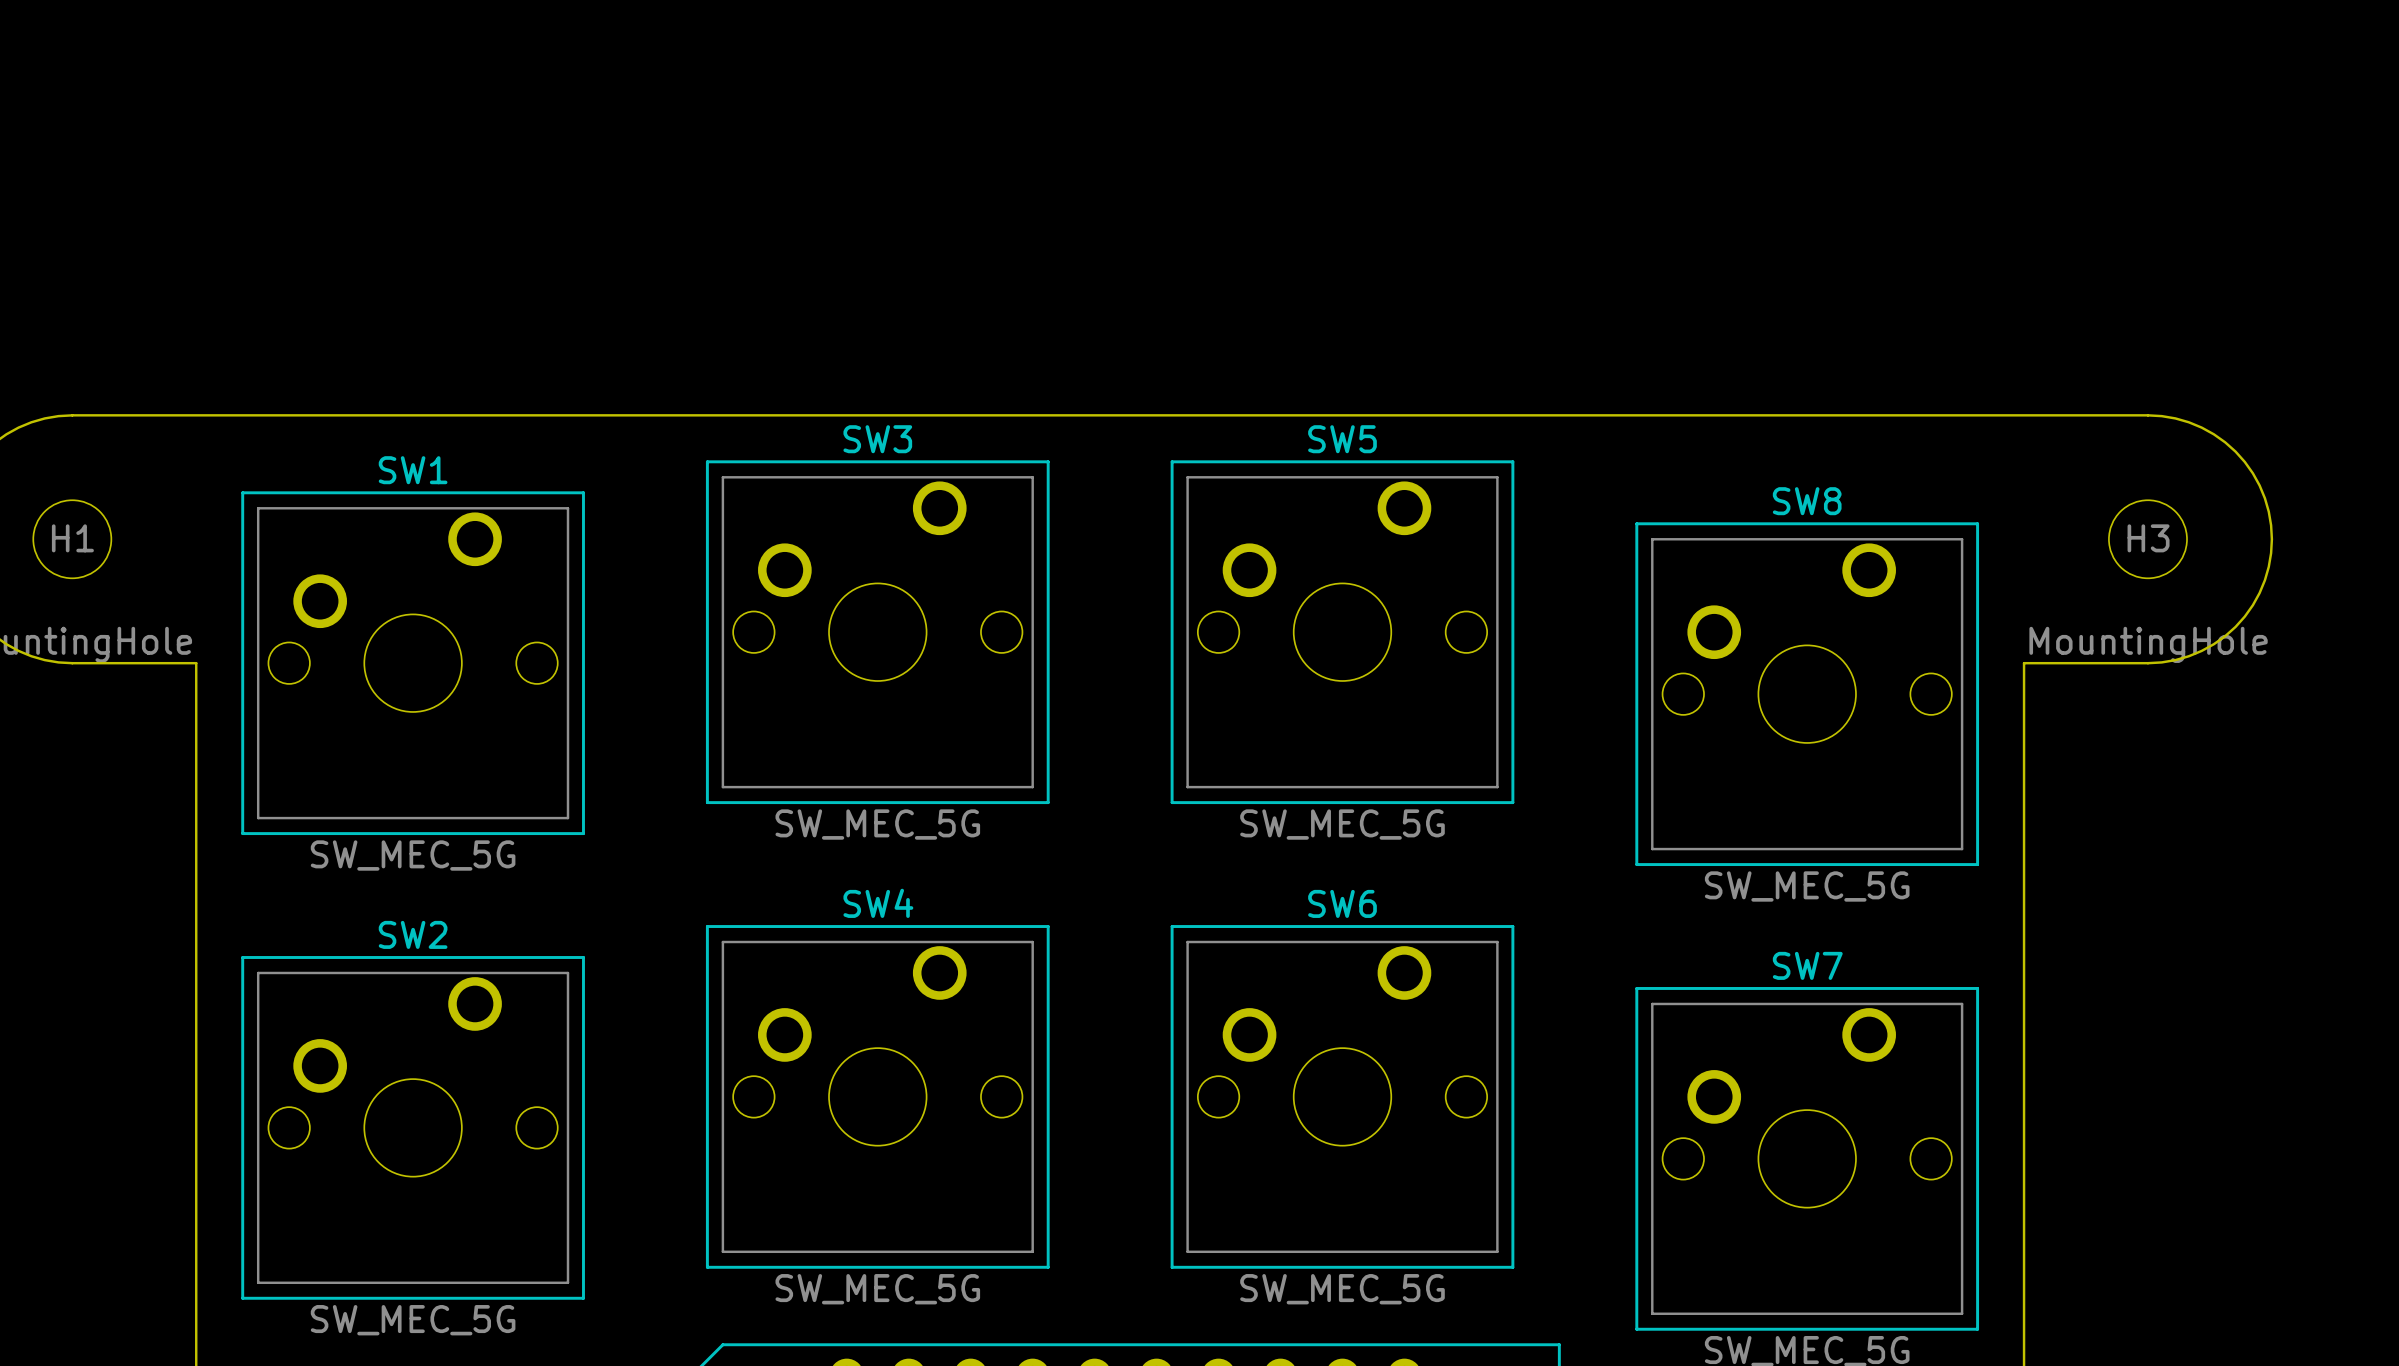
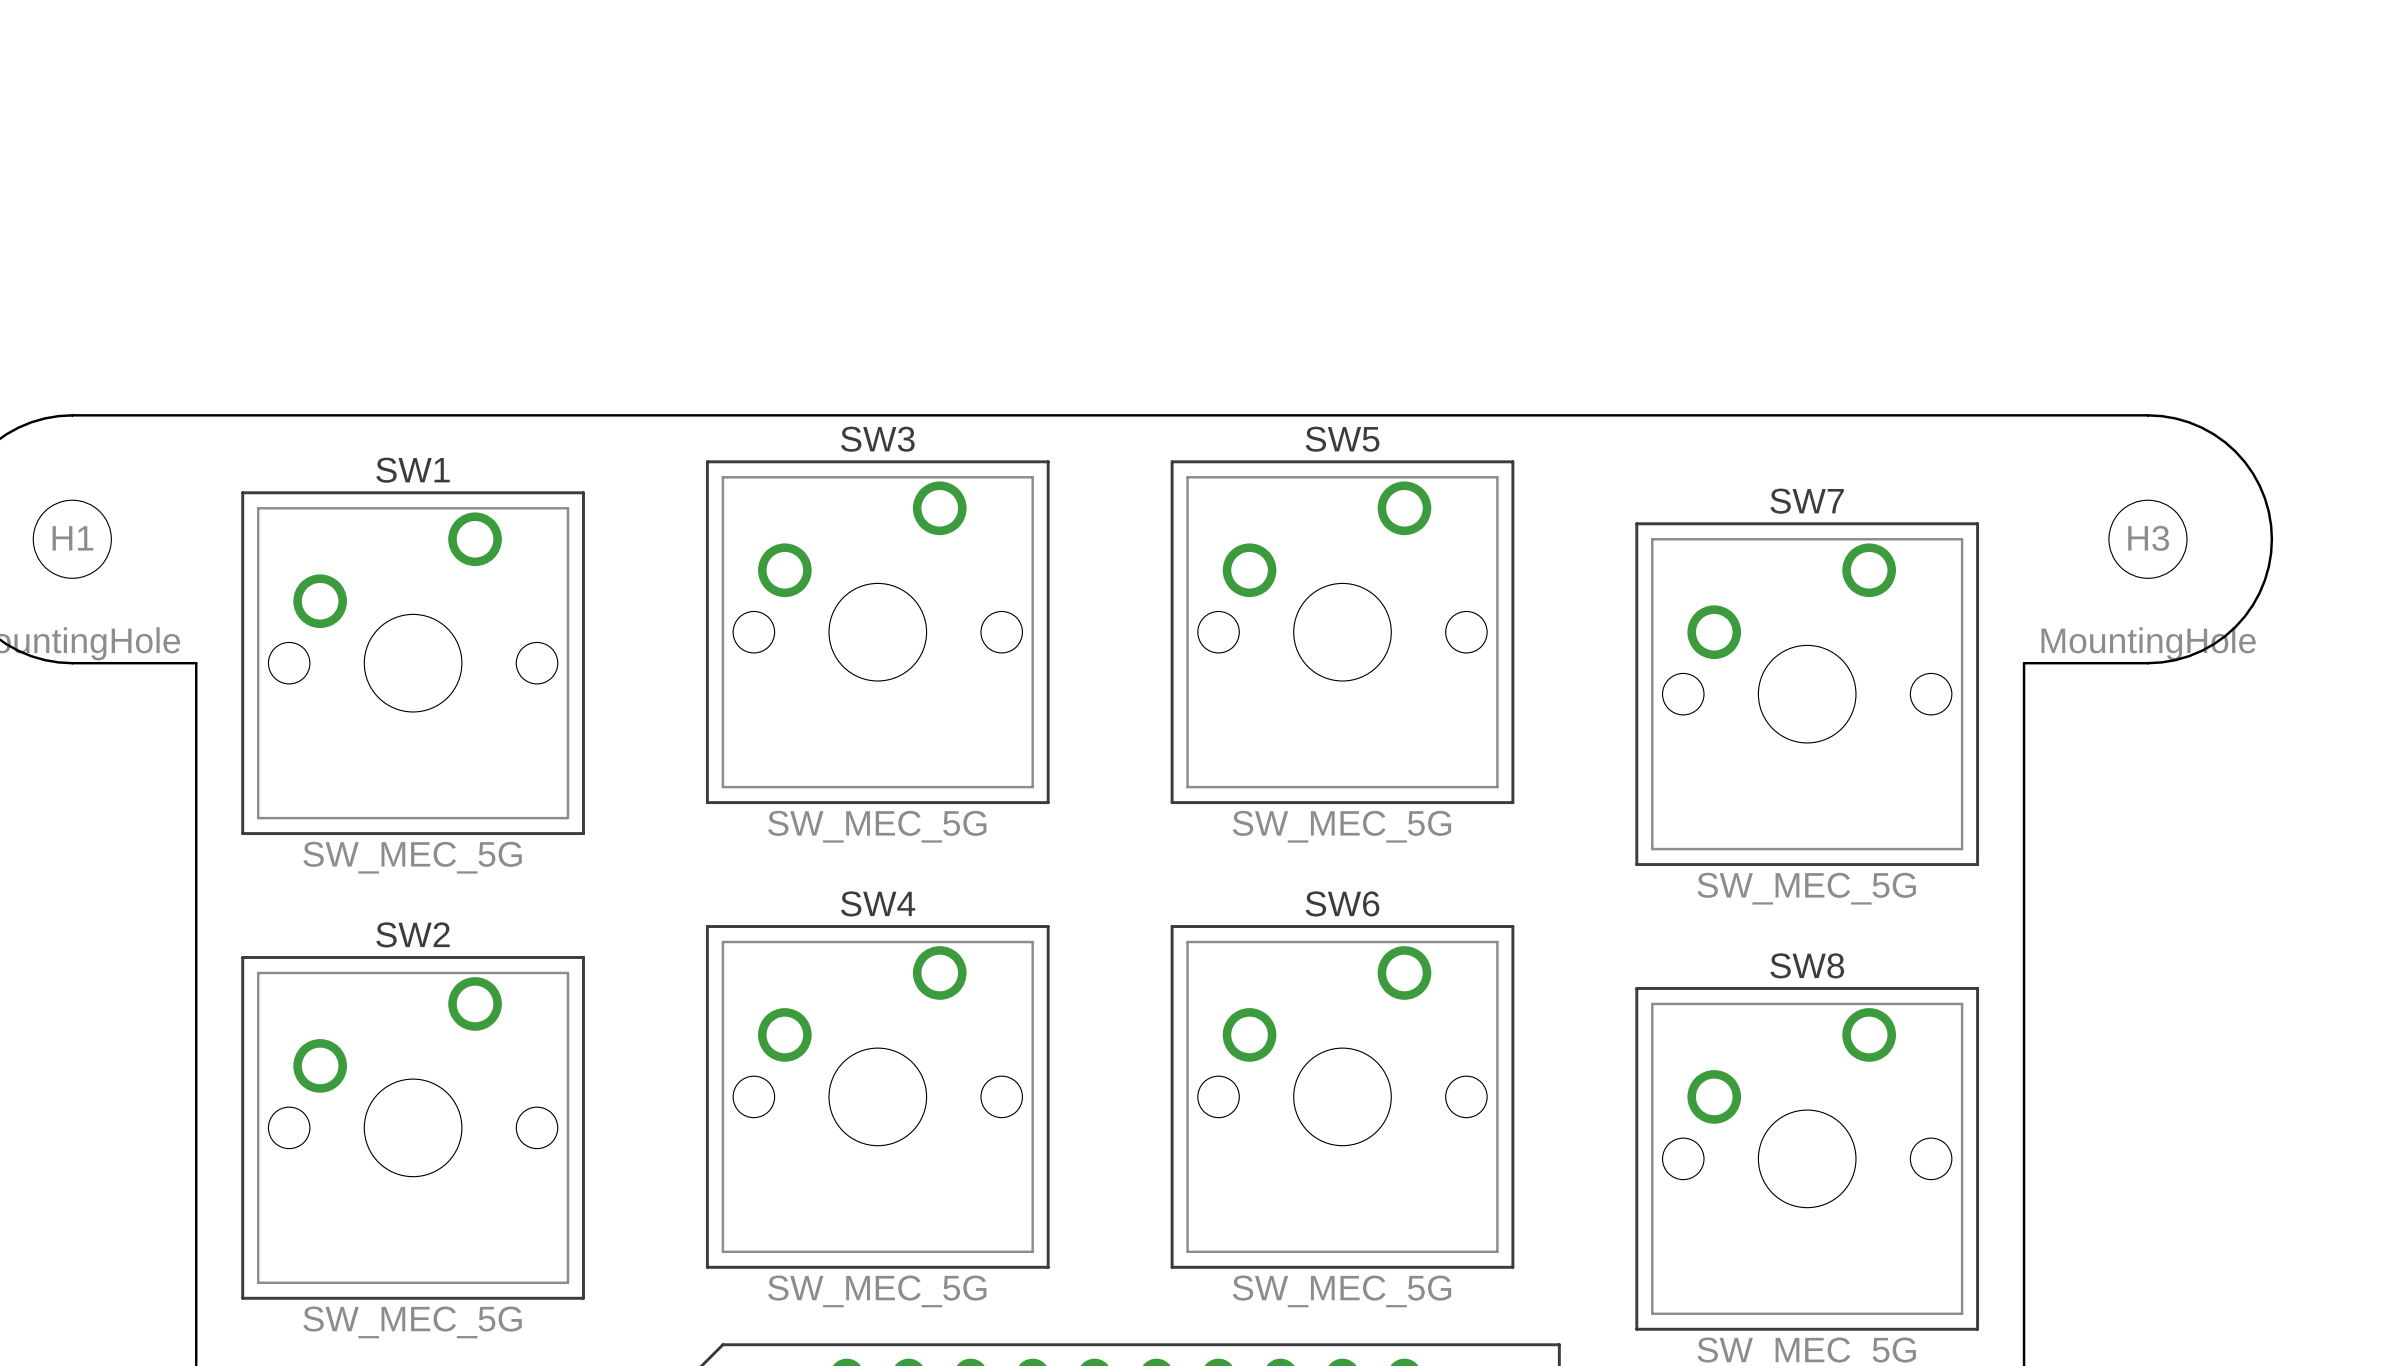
SW8 name: SW8 (1807, 501) -> SW7 (1807, 501)
SW7 name: SW7 (1807, 965) -> SW8 (1807, 965)

